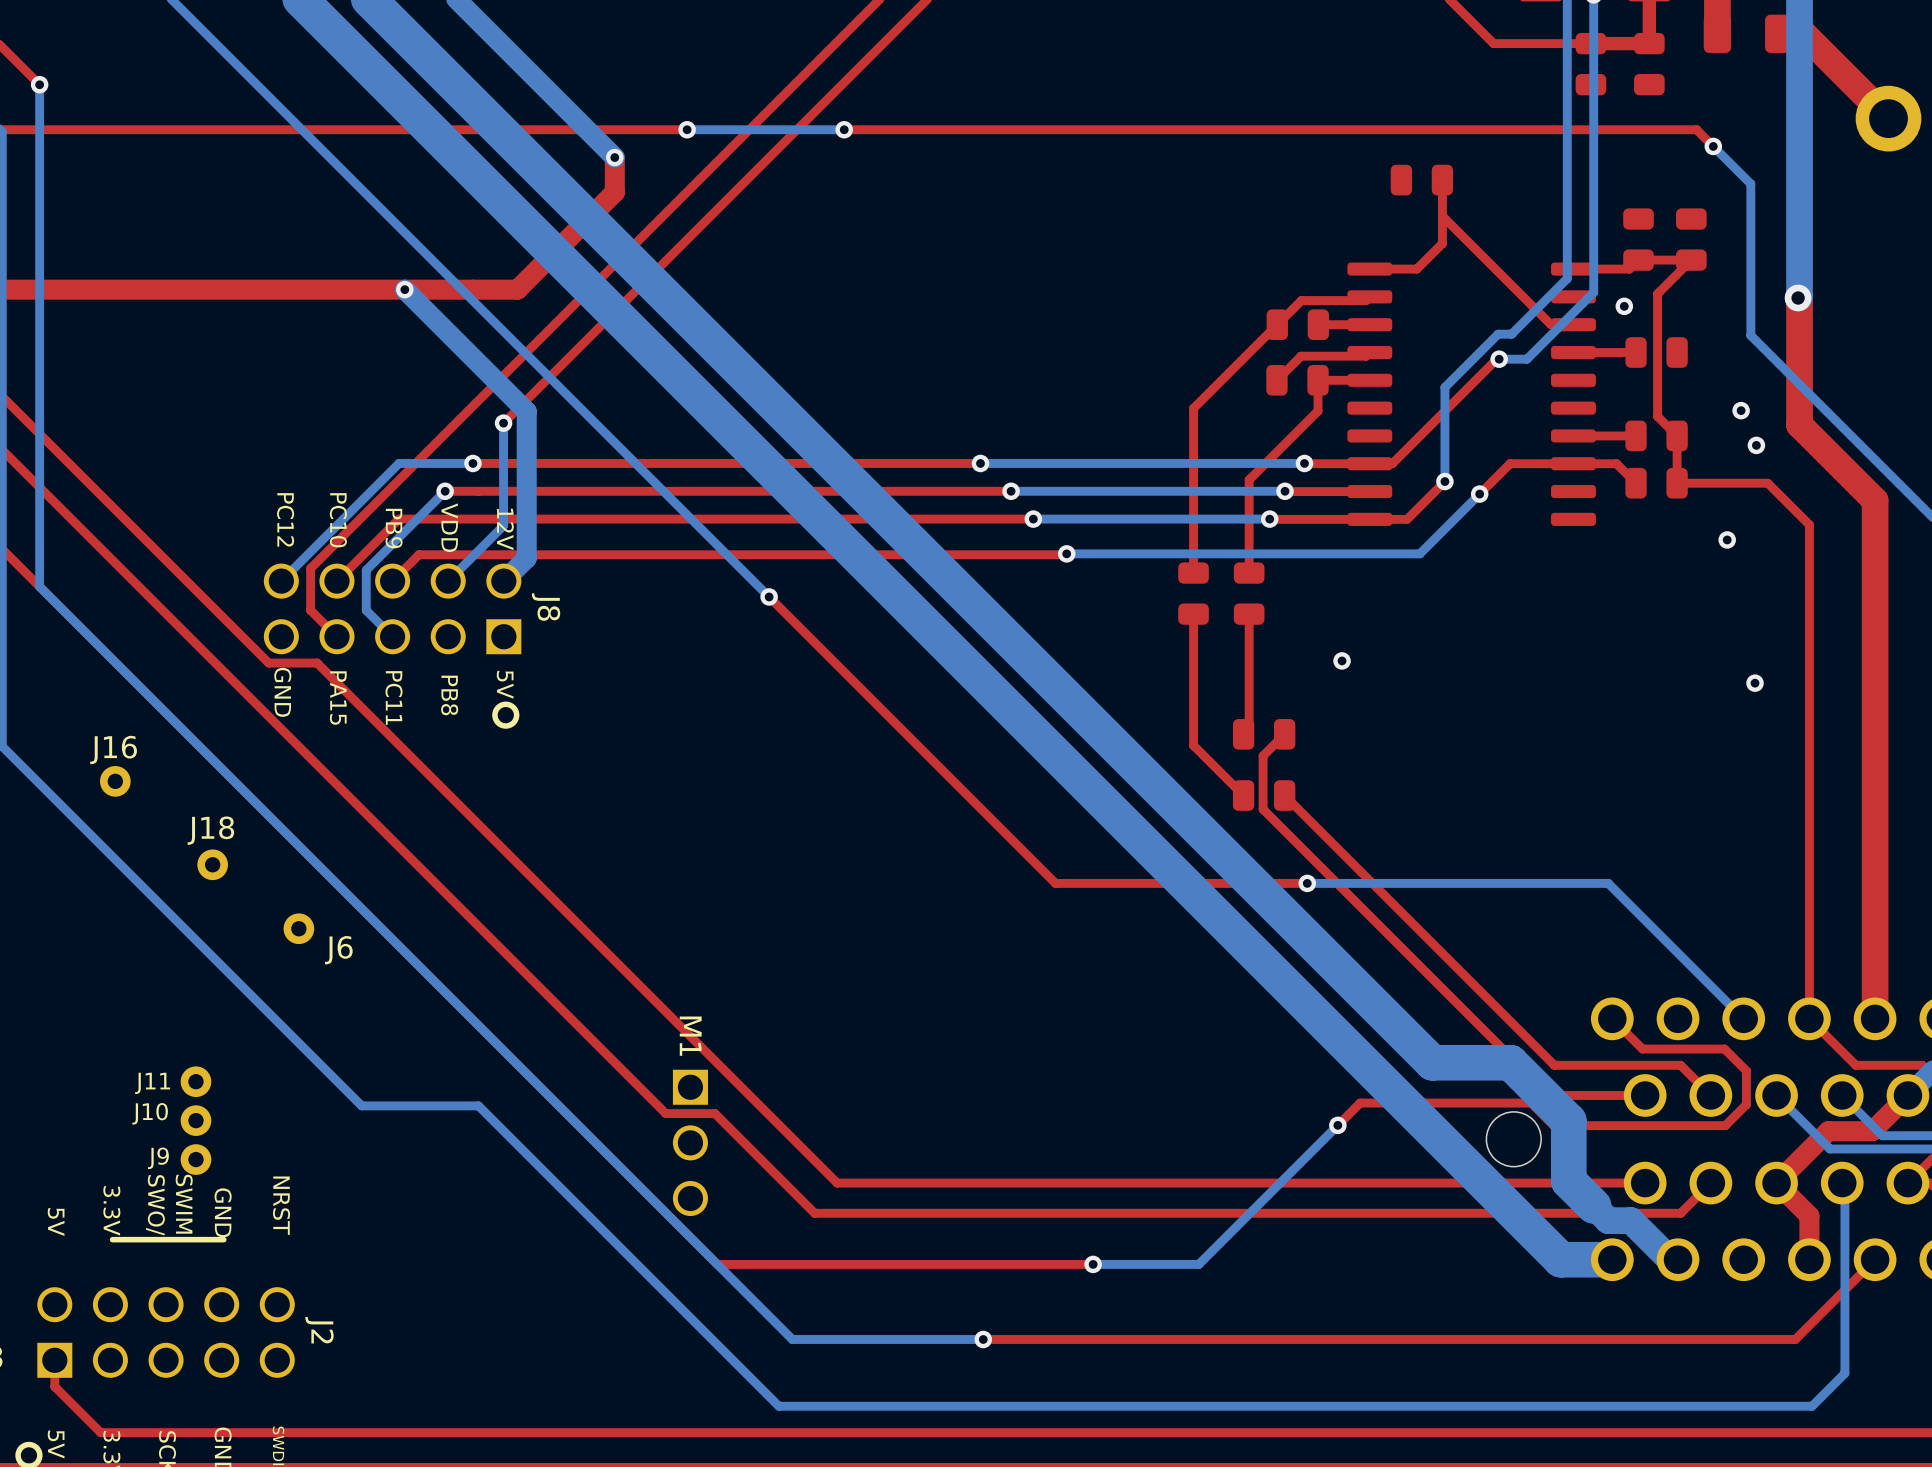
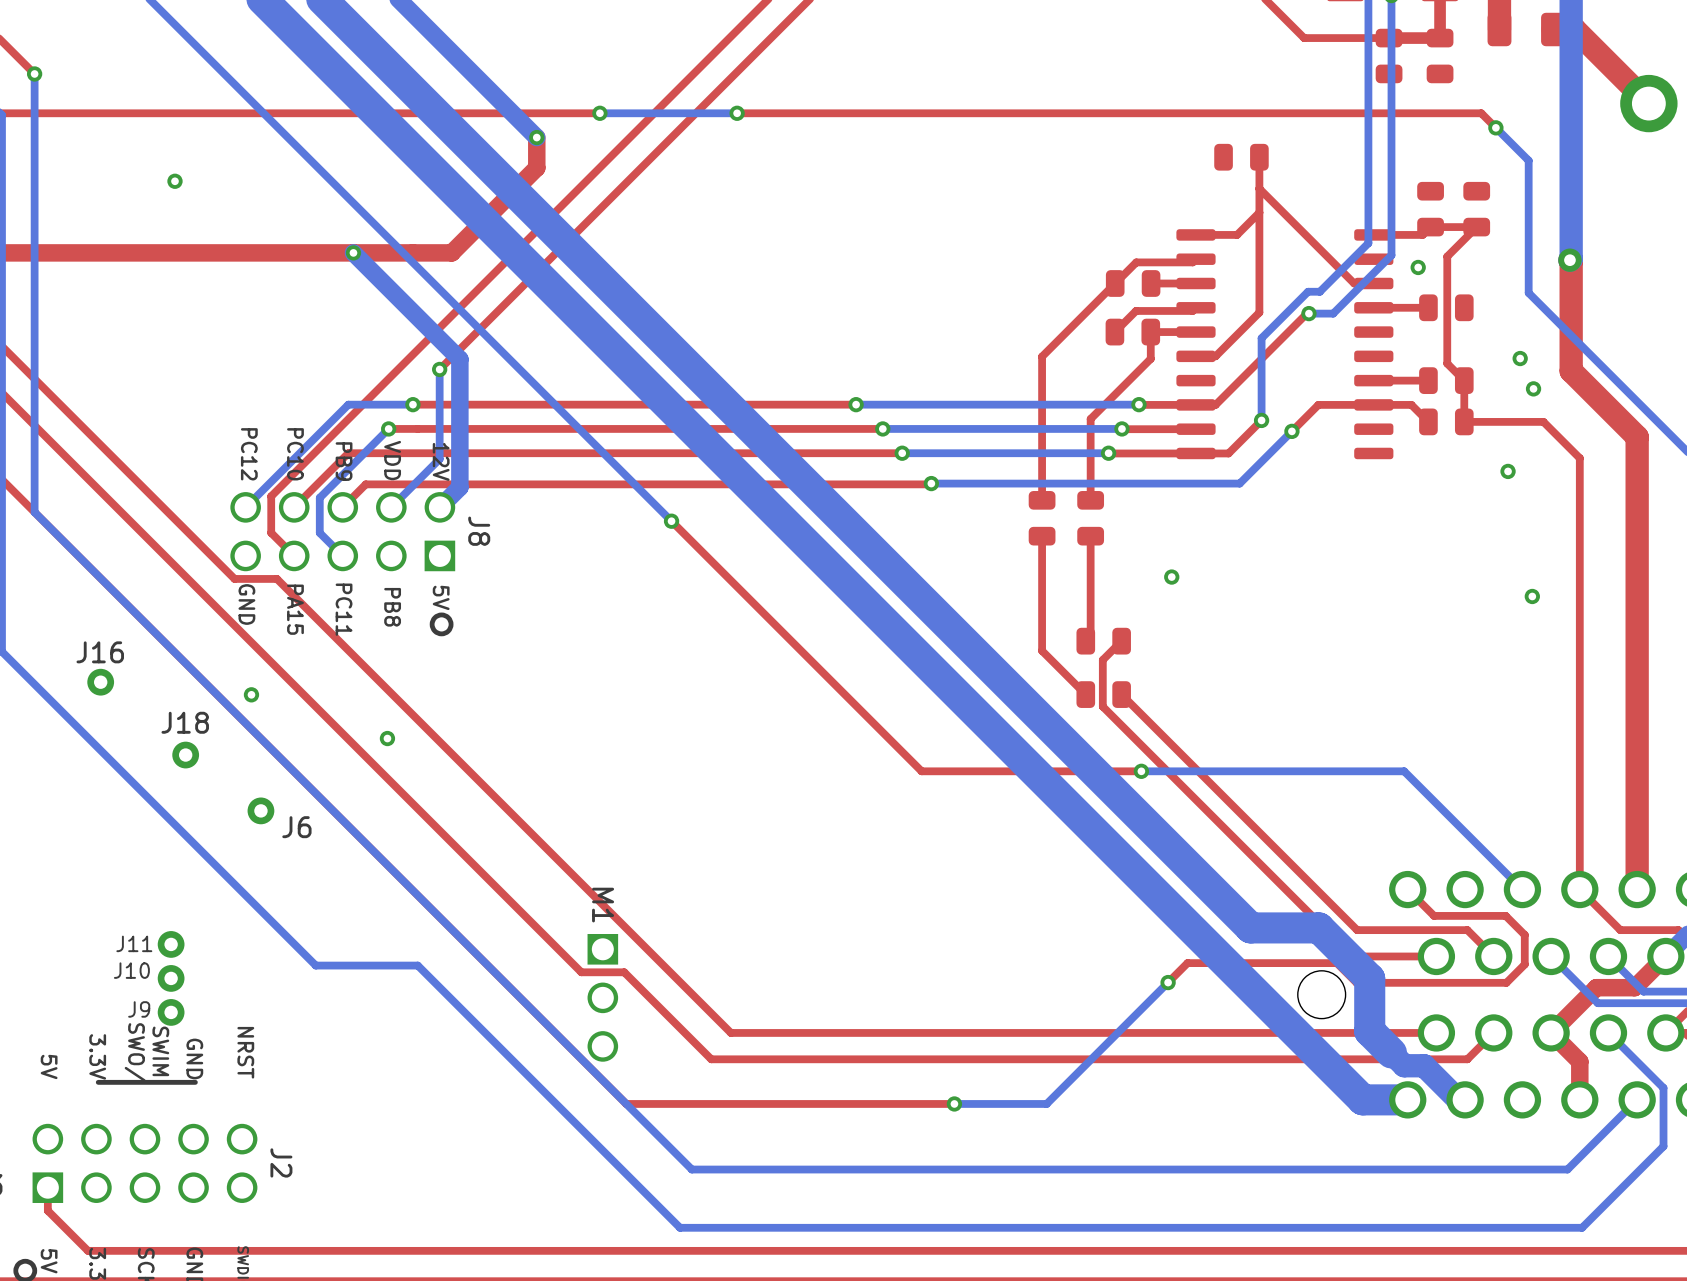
via: none -> (174, 181)
top track: none -> (1259, 212) (1259, 312) (1215, 356) (1195, 356)
via: none -> (251, 694)
via: none -> (387, 738)
bottom track: (1844, 1185) (1844, 1373) -> (1610, 1035) (1663, 1087) (1663, 1146) (1610, 1199)
top track: (1875, 1259) (1795, 1339) (983, 1339) -> none
bottom track: none -> (1637, 1099) (1567, 1169) (858, 1169)
via: (983, 1339) -> none

